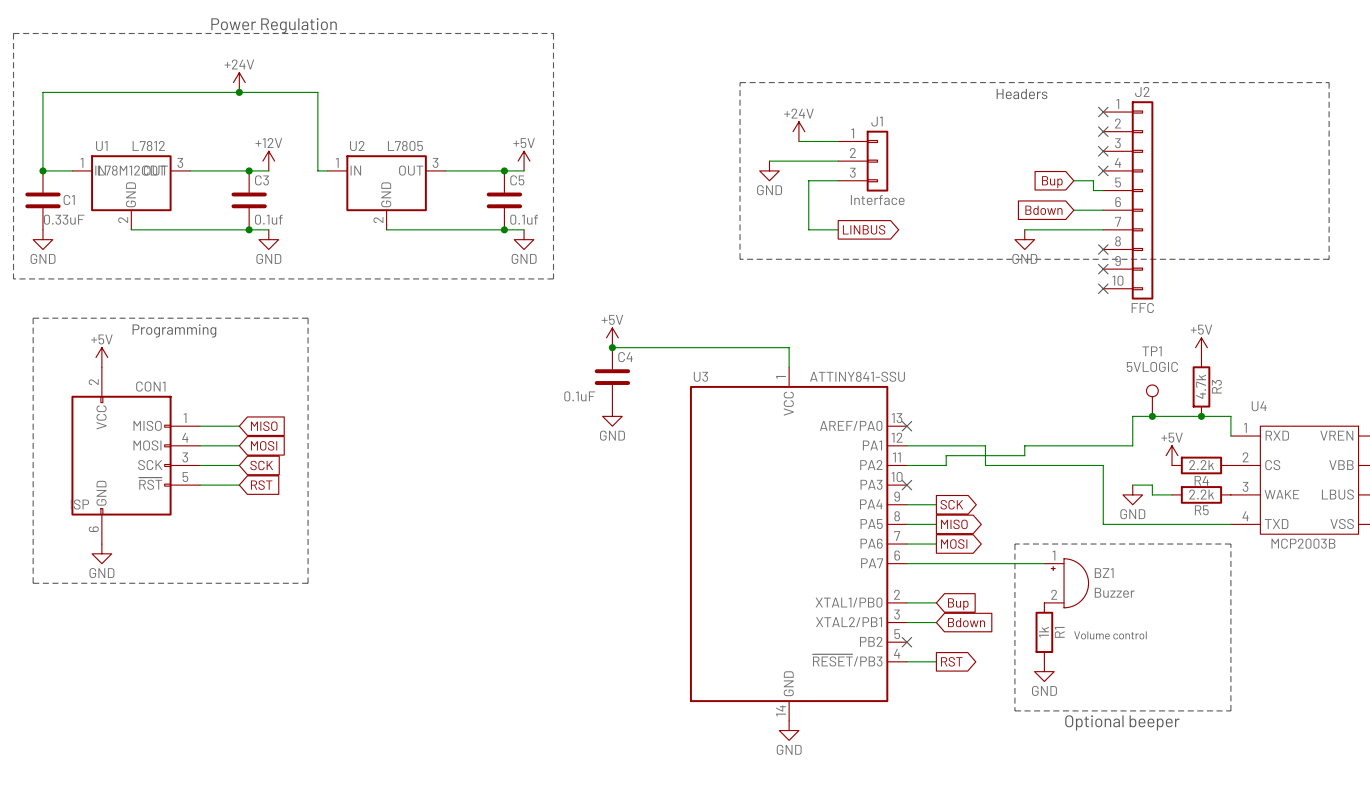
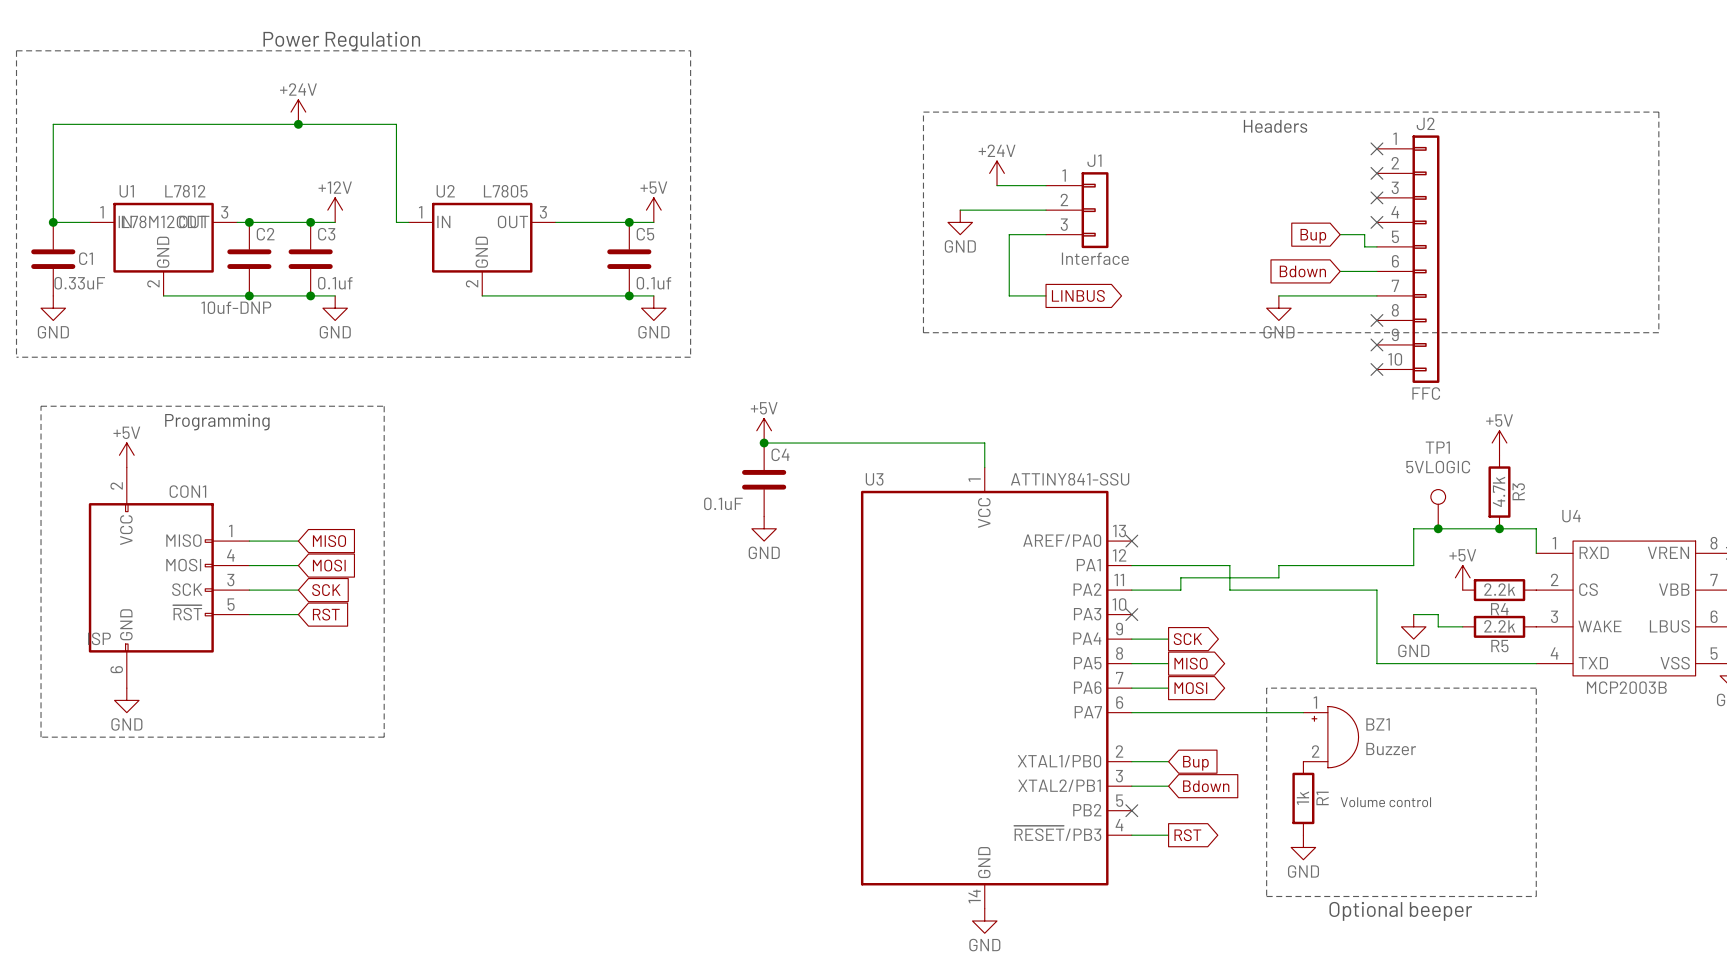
junction: none -> (249, 222)
C2: none -> 10uf-DNP (249, 259)
junction: none -> (249, 295)

